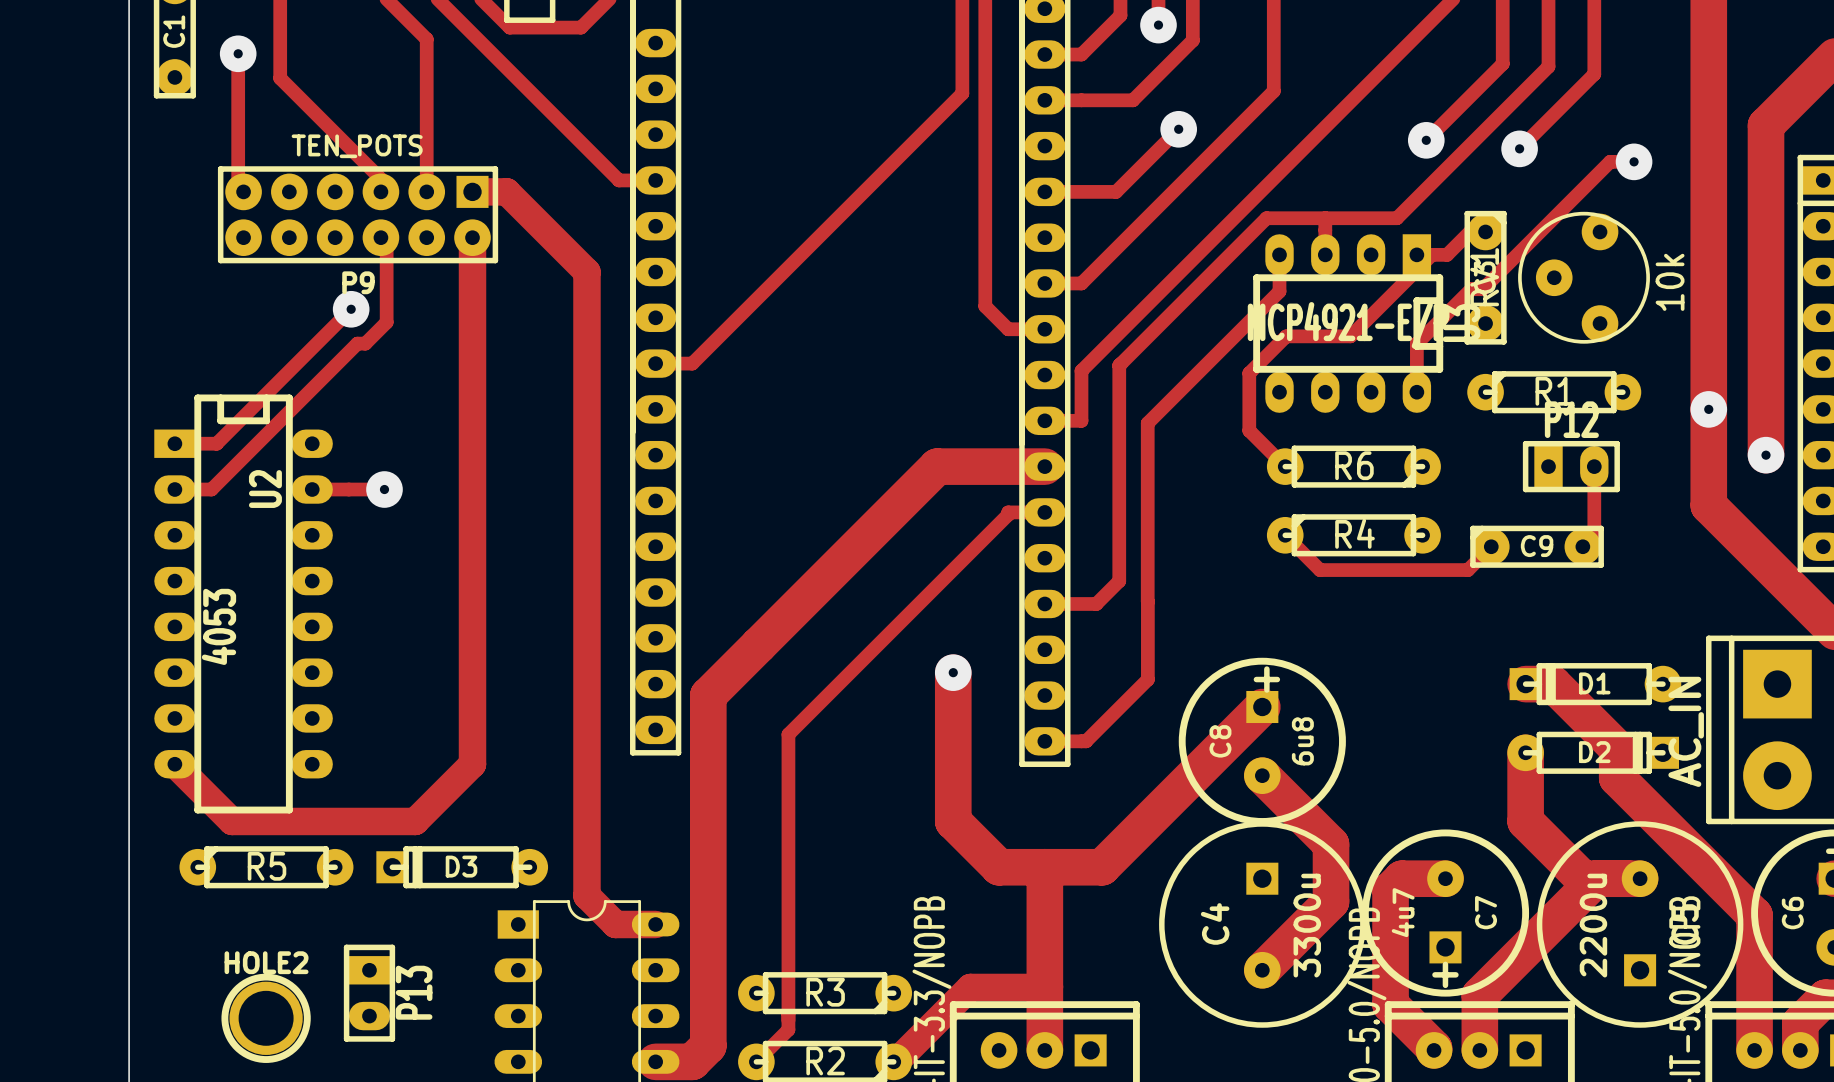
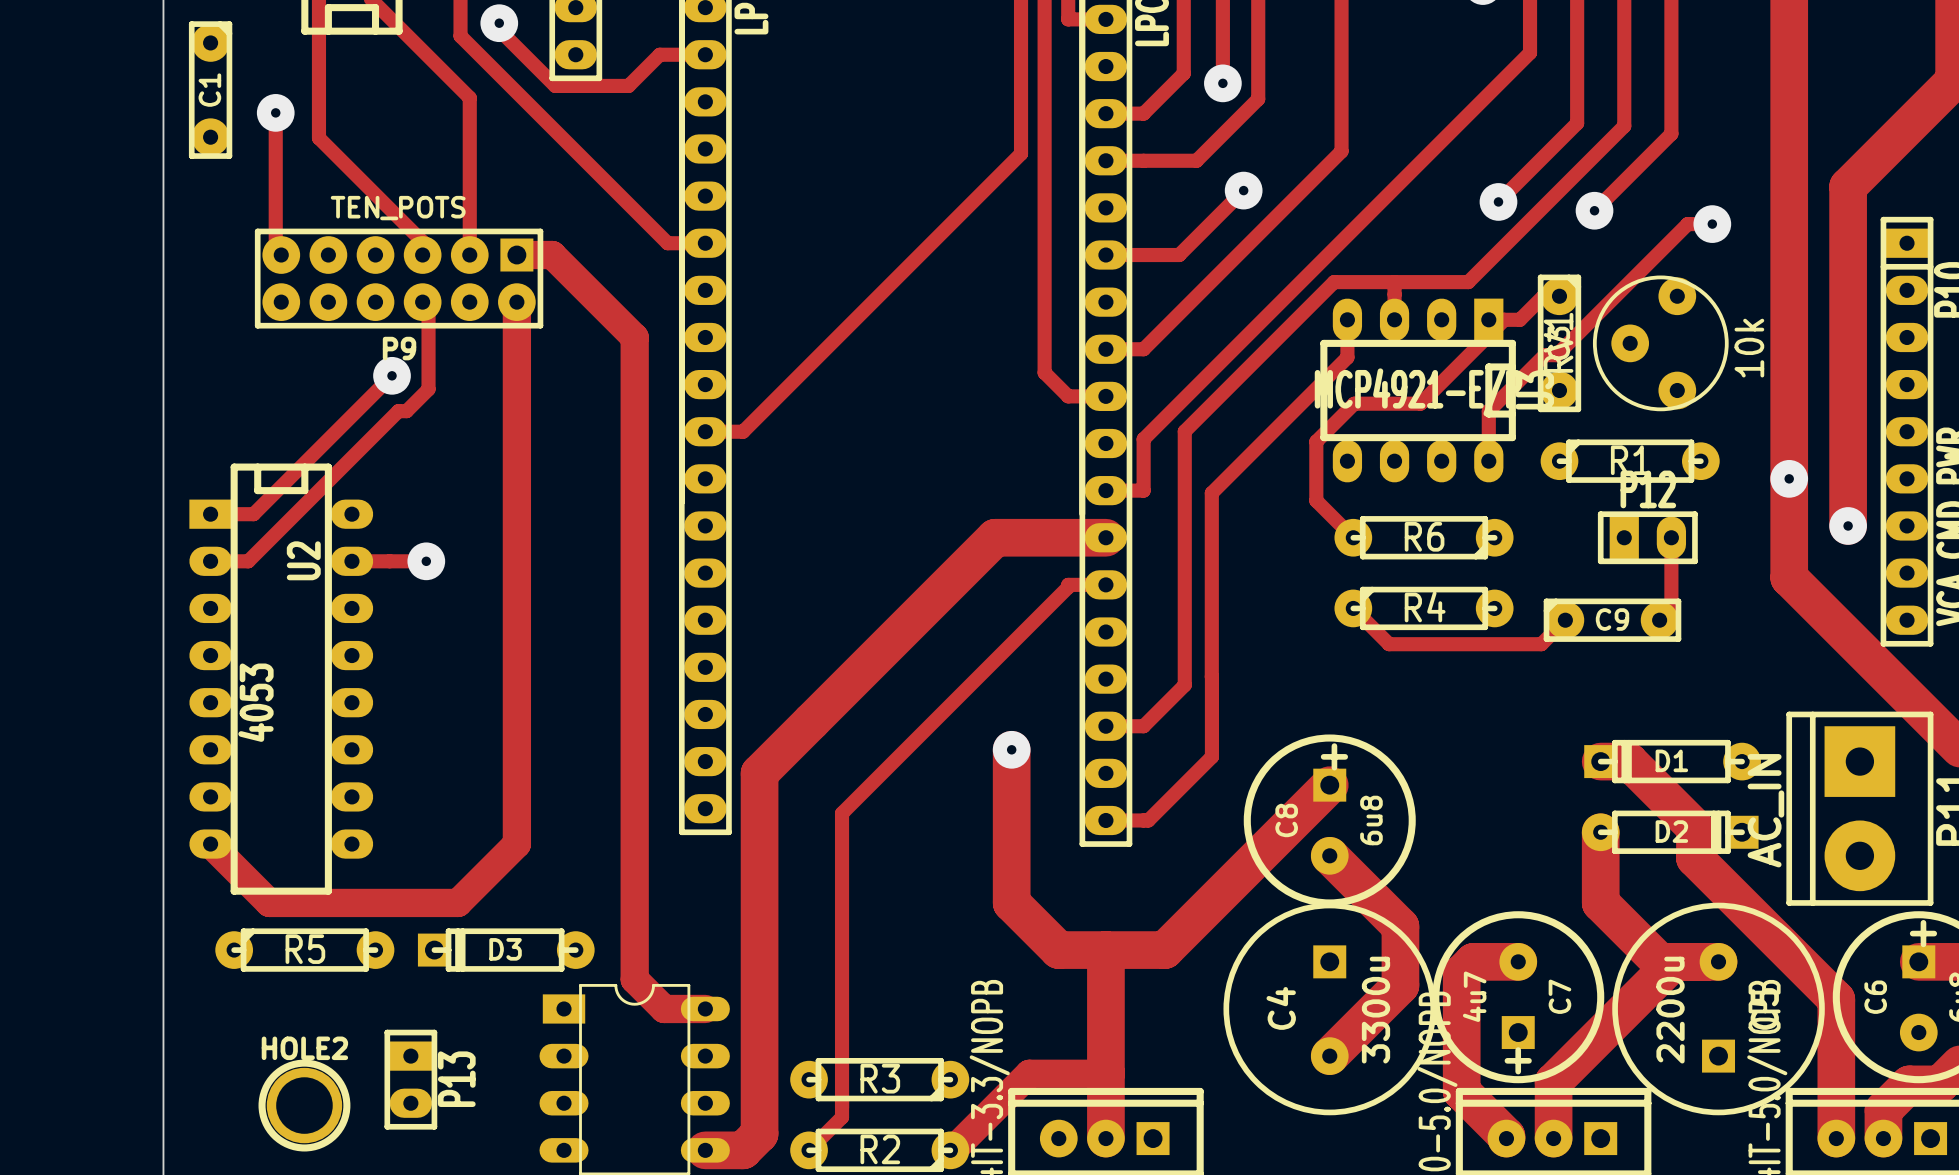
track: (1121, 363) (1119, 365) (1119, 581) (1096, 603) (1044, 603) -> (1184, 431) (1184, 685) (1143, 726) (1105, 726)

